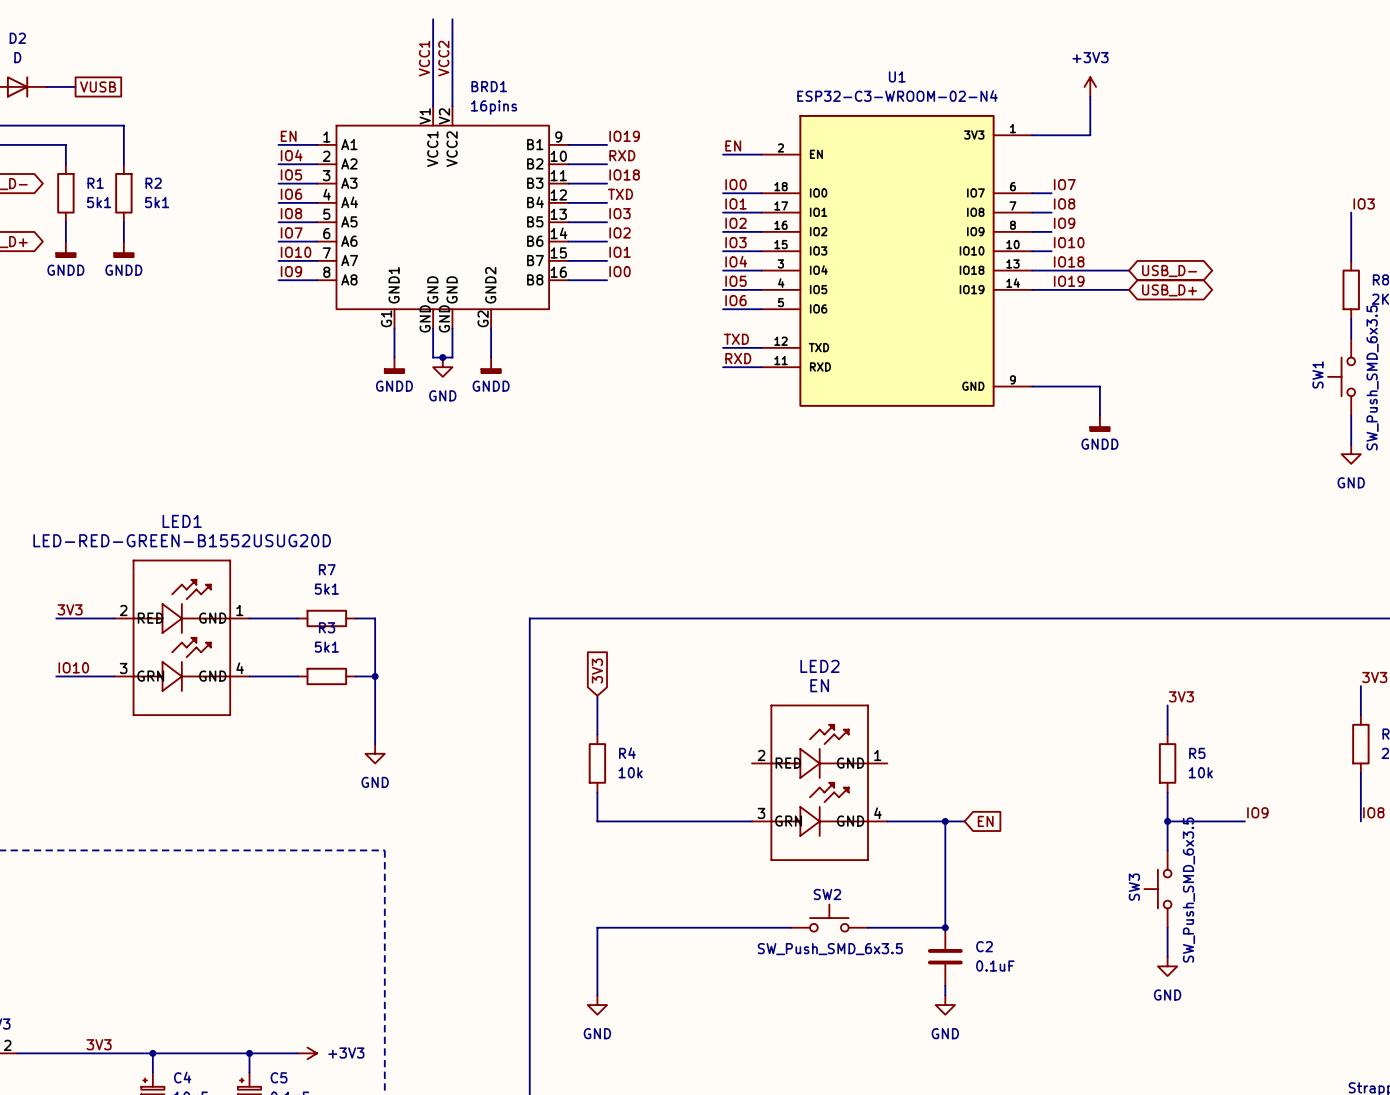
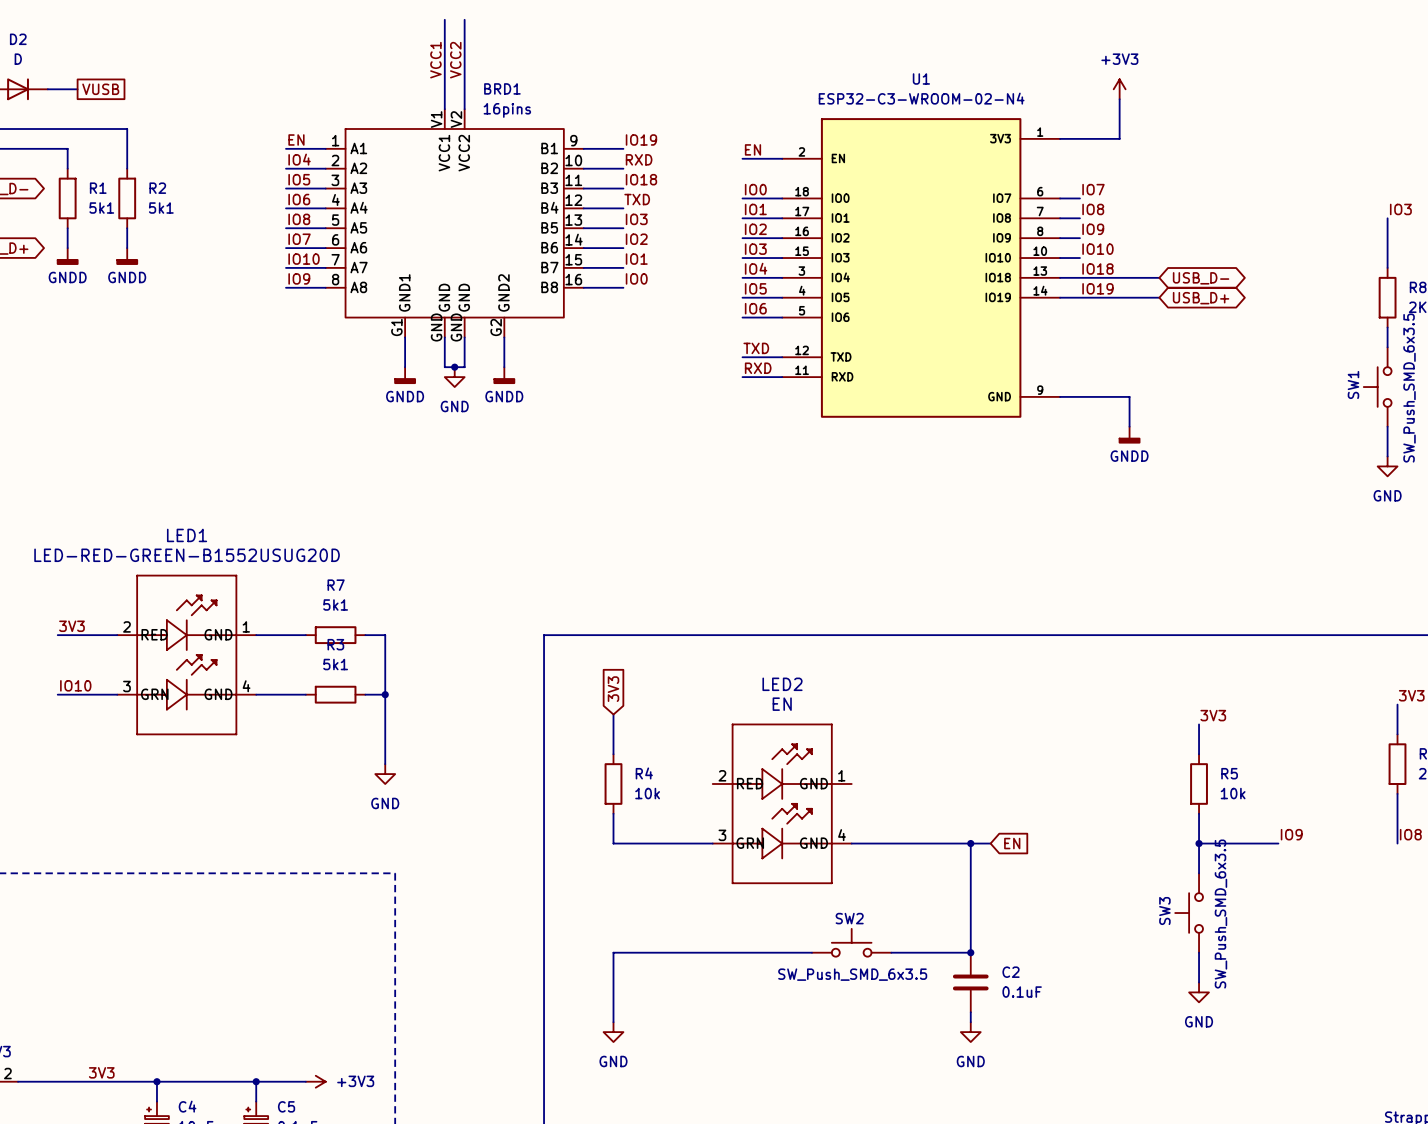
LED2 position: (819, 782) -> (782, 803)

